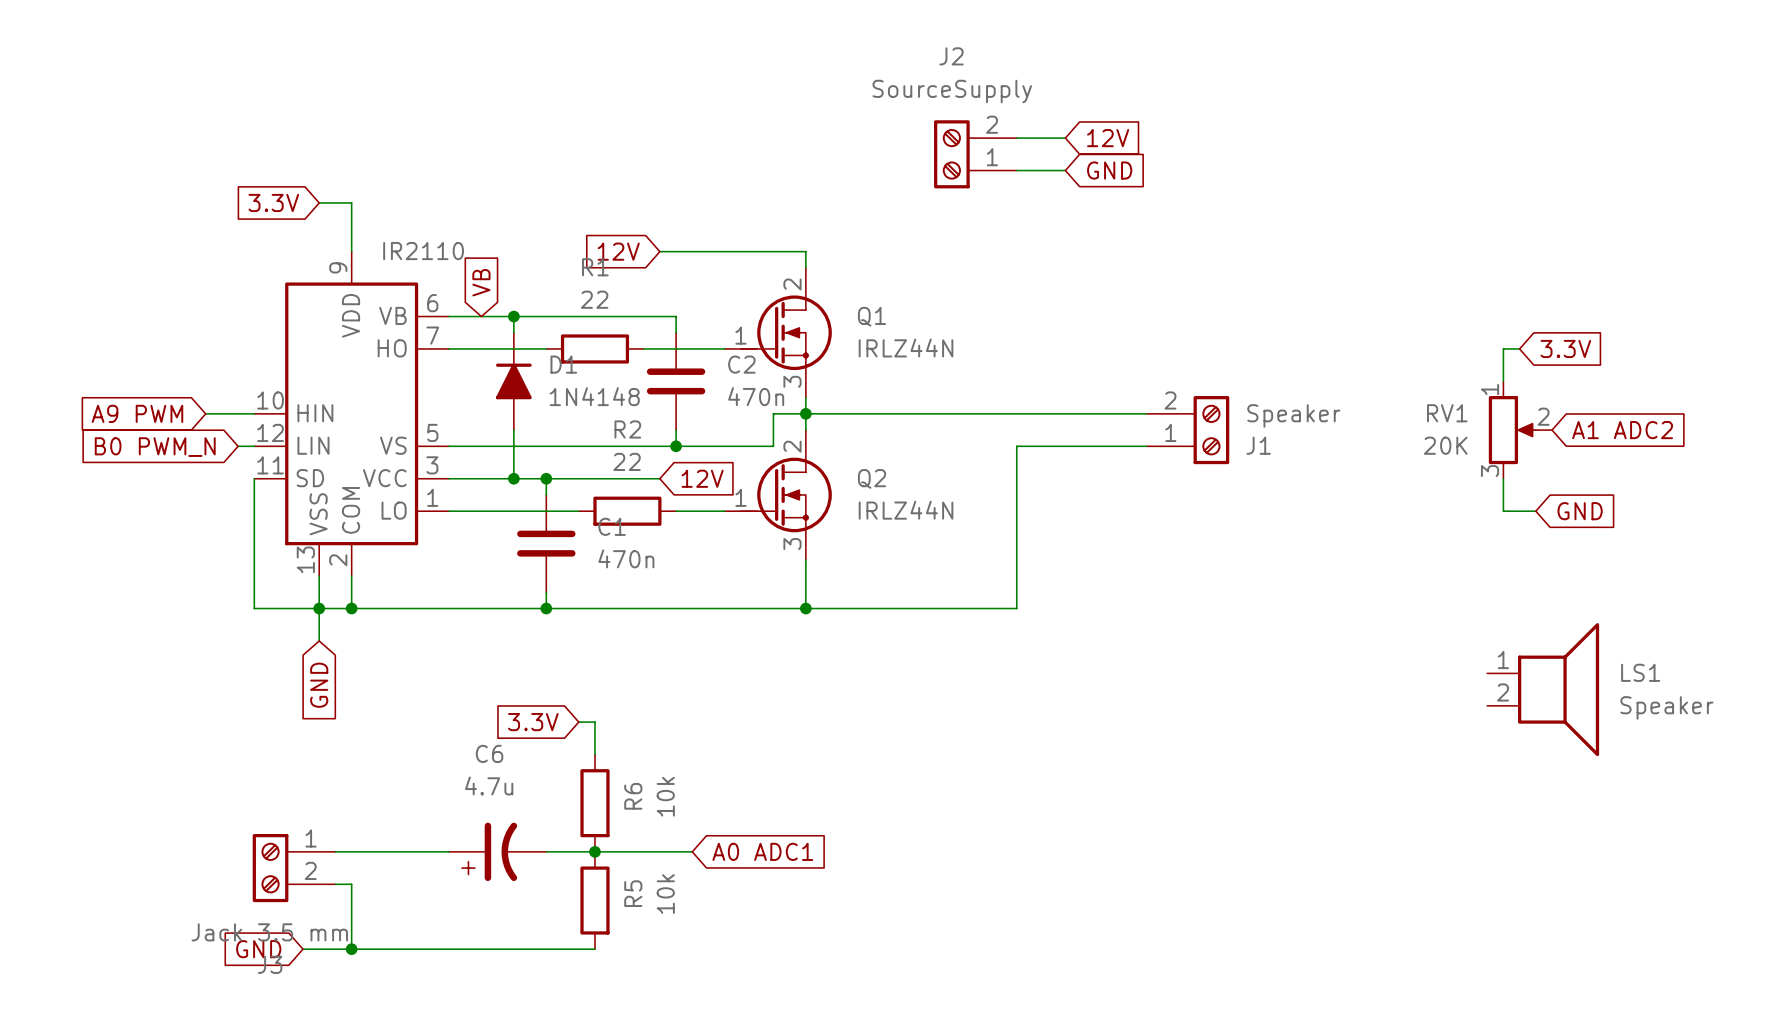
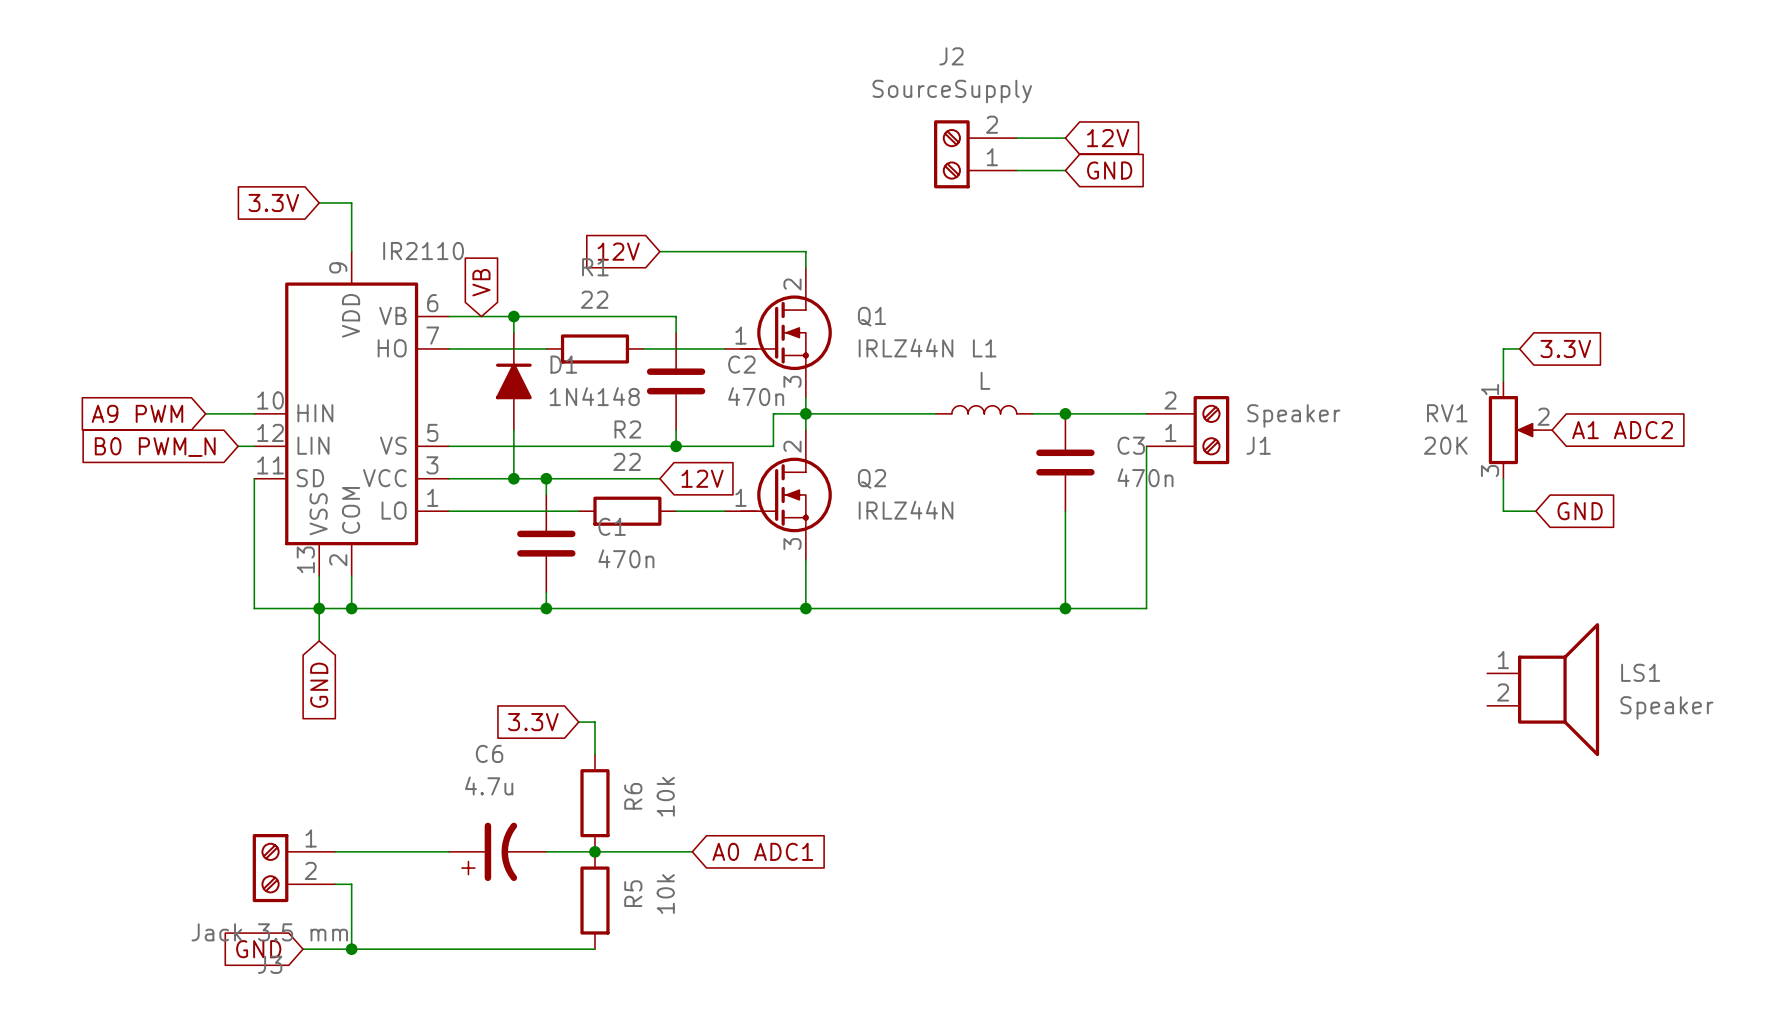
L1: none -> L (984, 409)
wire: (935, 413) (1032, 413) -> none
junction: none -> (1065, 413)
wire: (1146, 446) (1016, 446) (1016, 608) -> (1146, 446) (1146, 608) (1016, 608)
C3: none -> 470n (1065, 462)
wire: none -> (1065, 511) (1065, 608)
junction: none -> (1065, 608)

